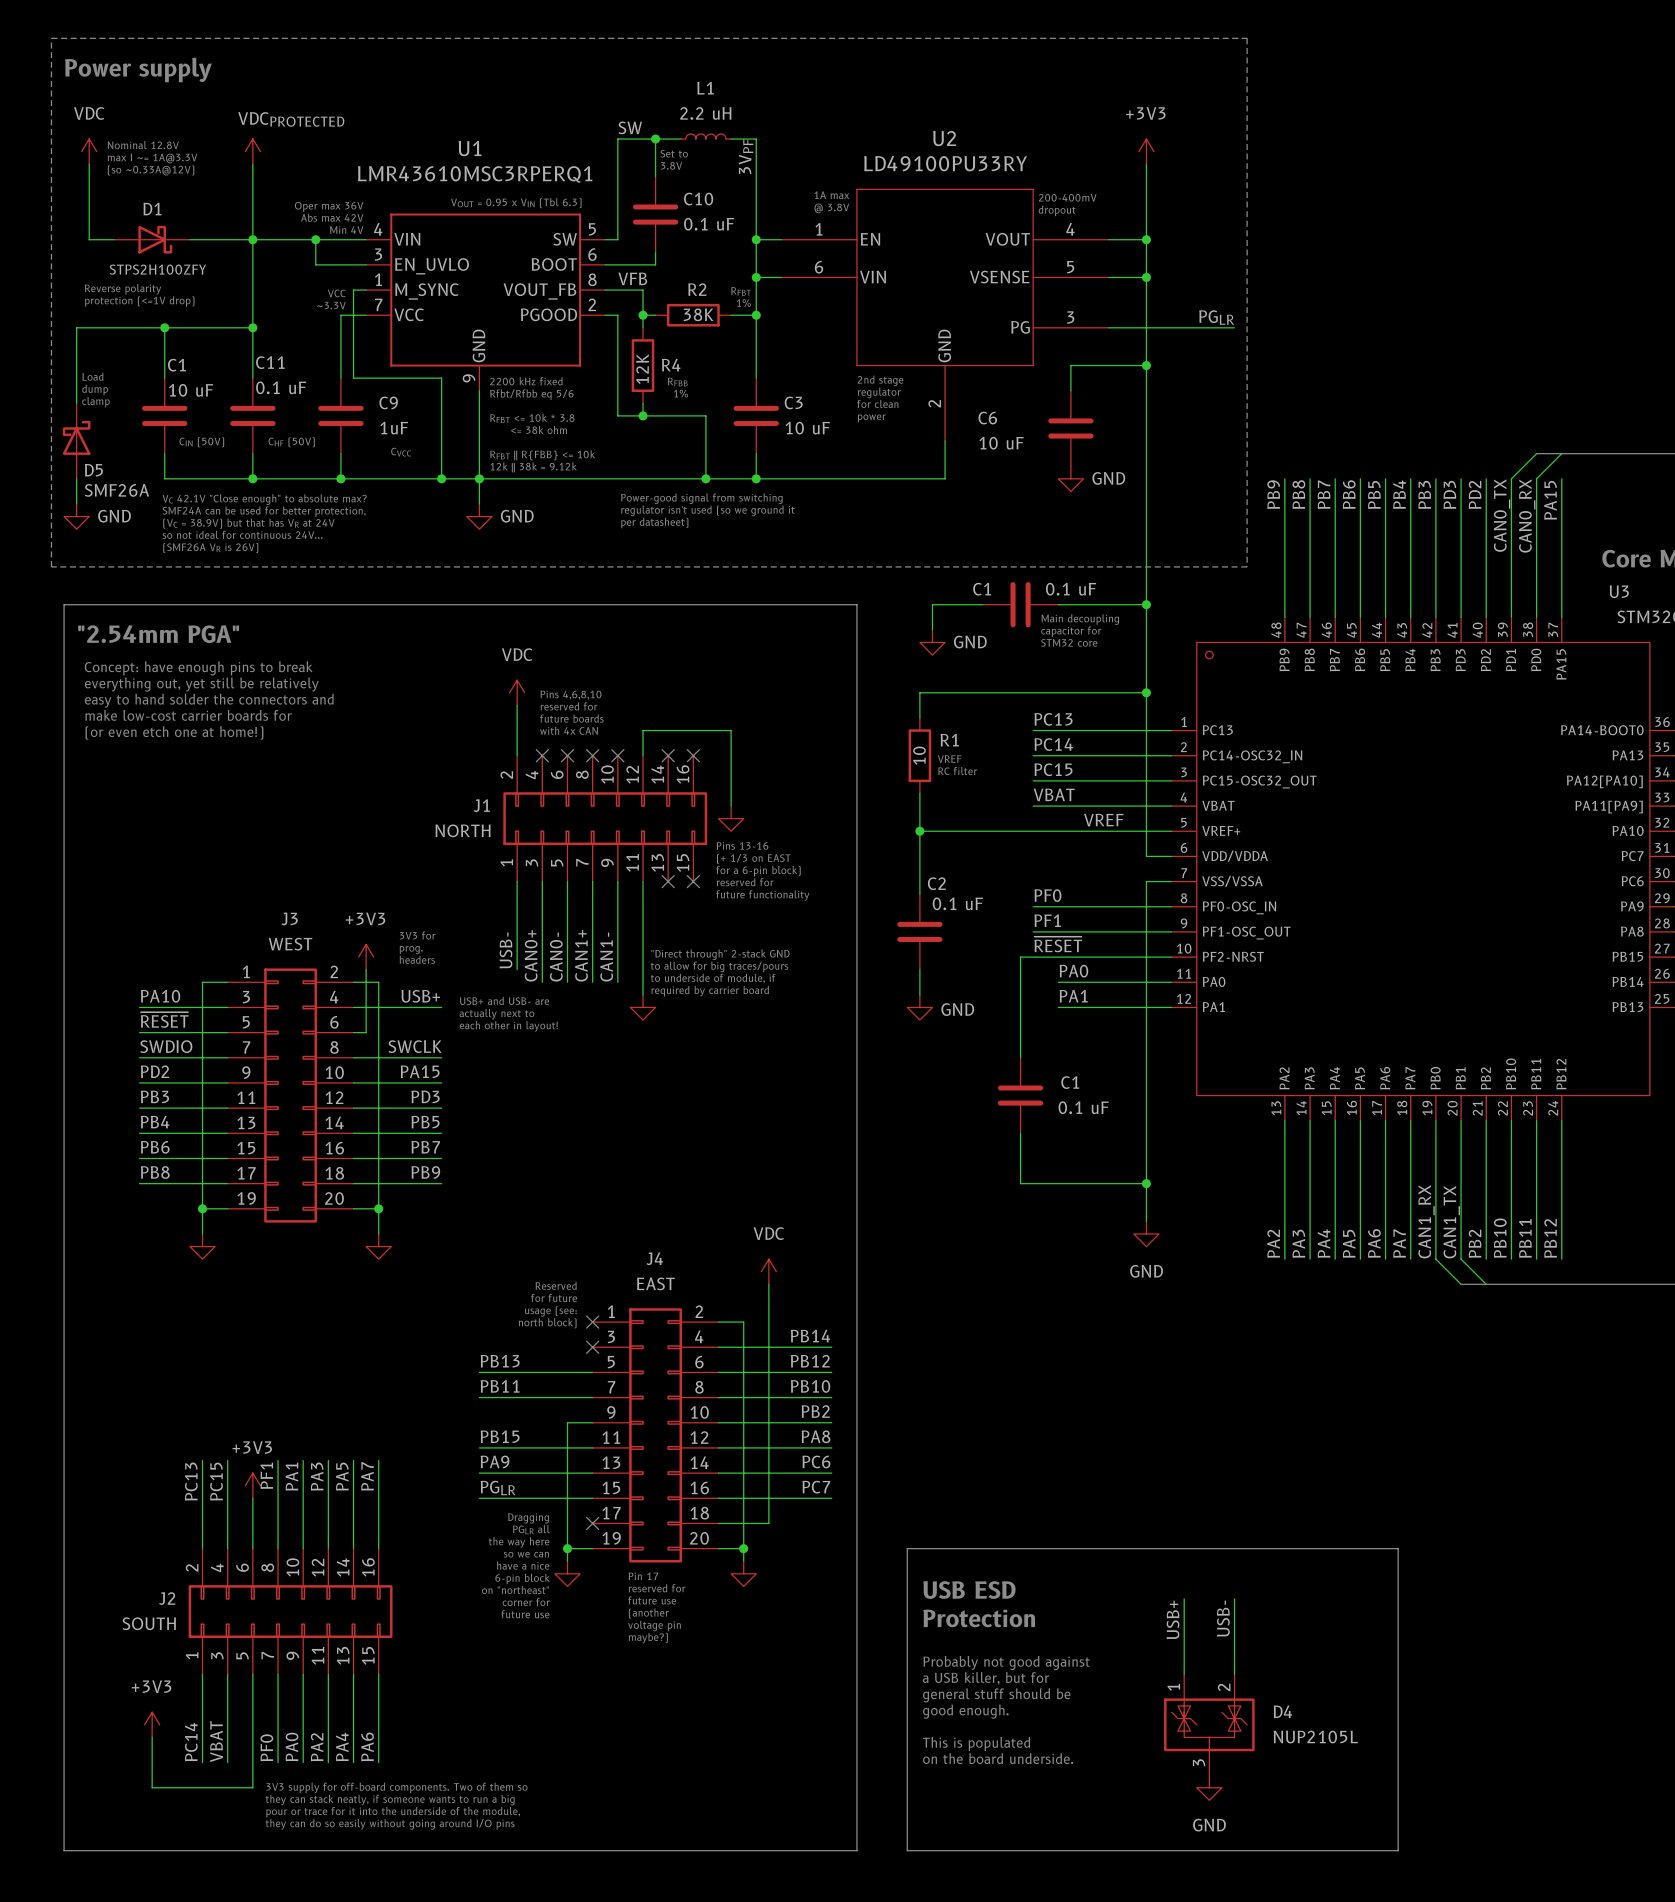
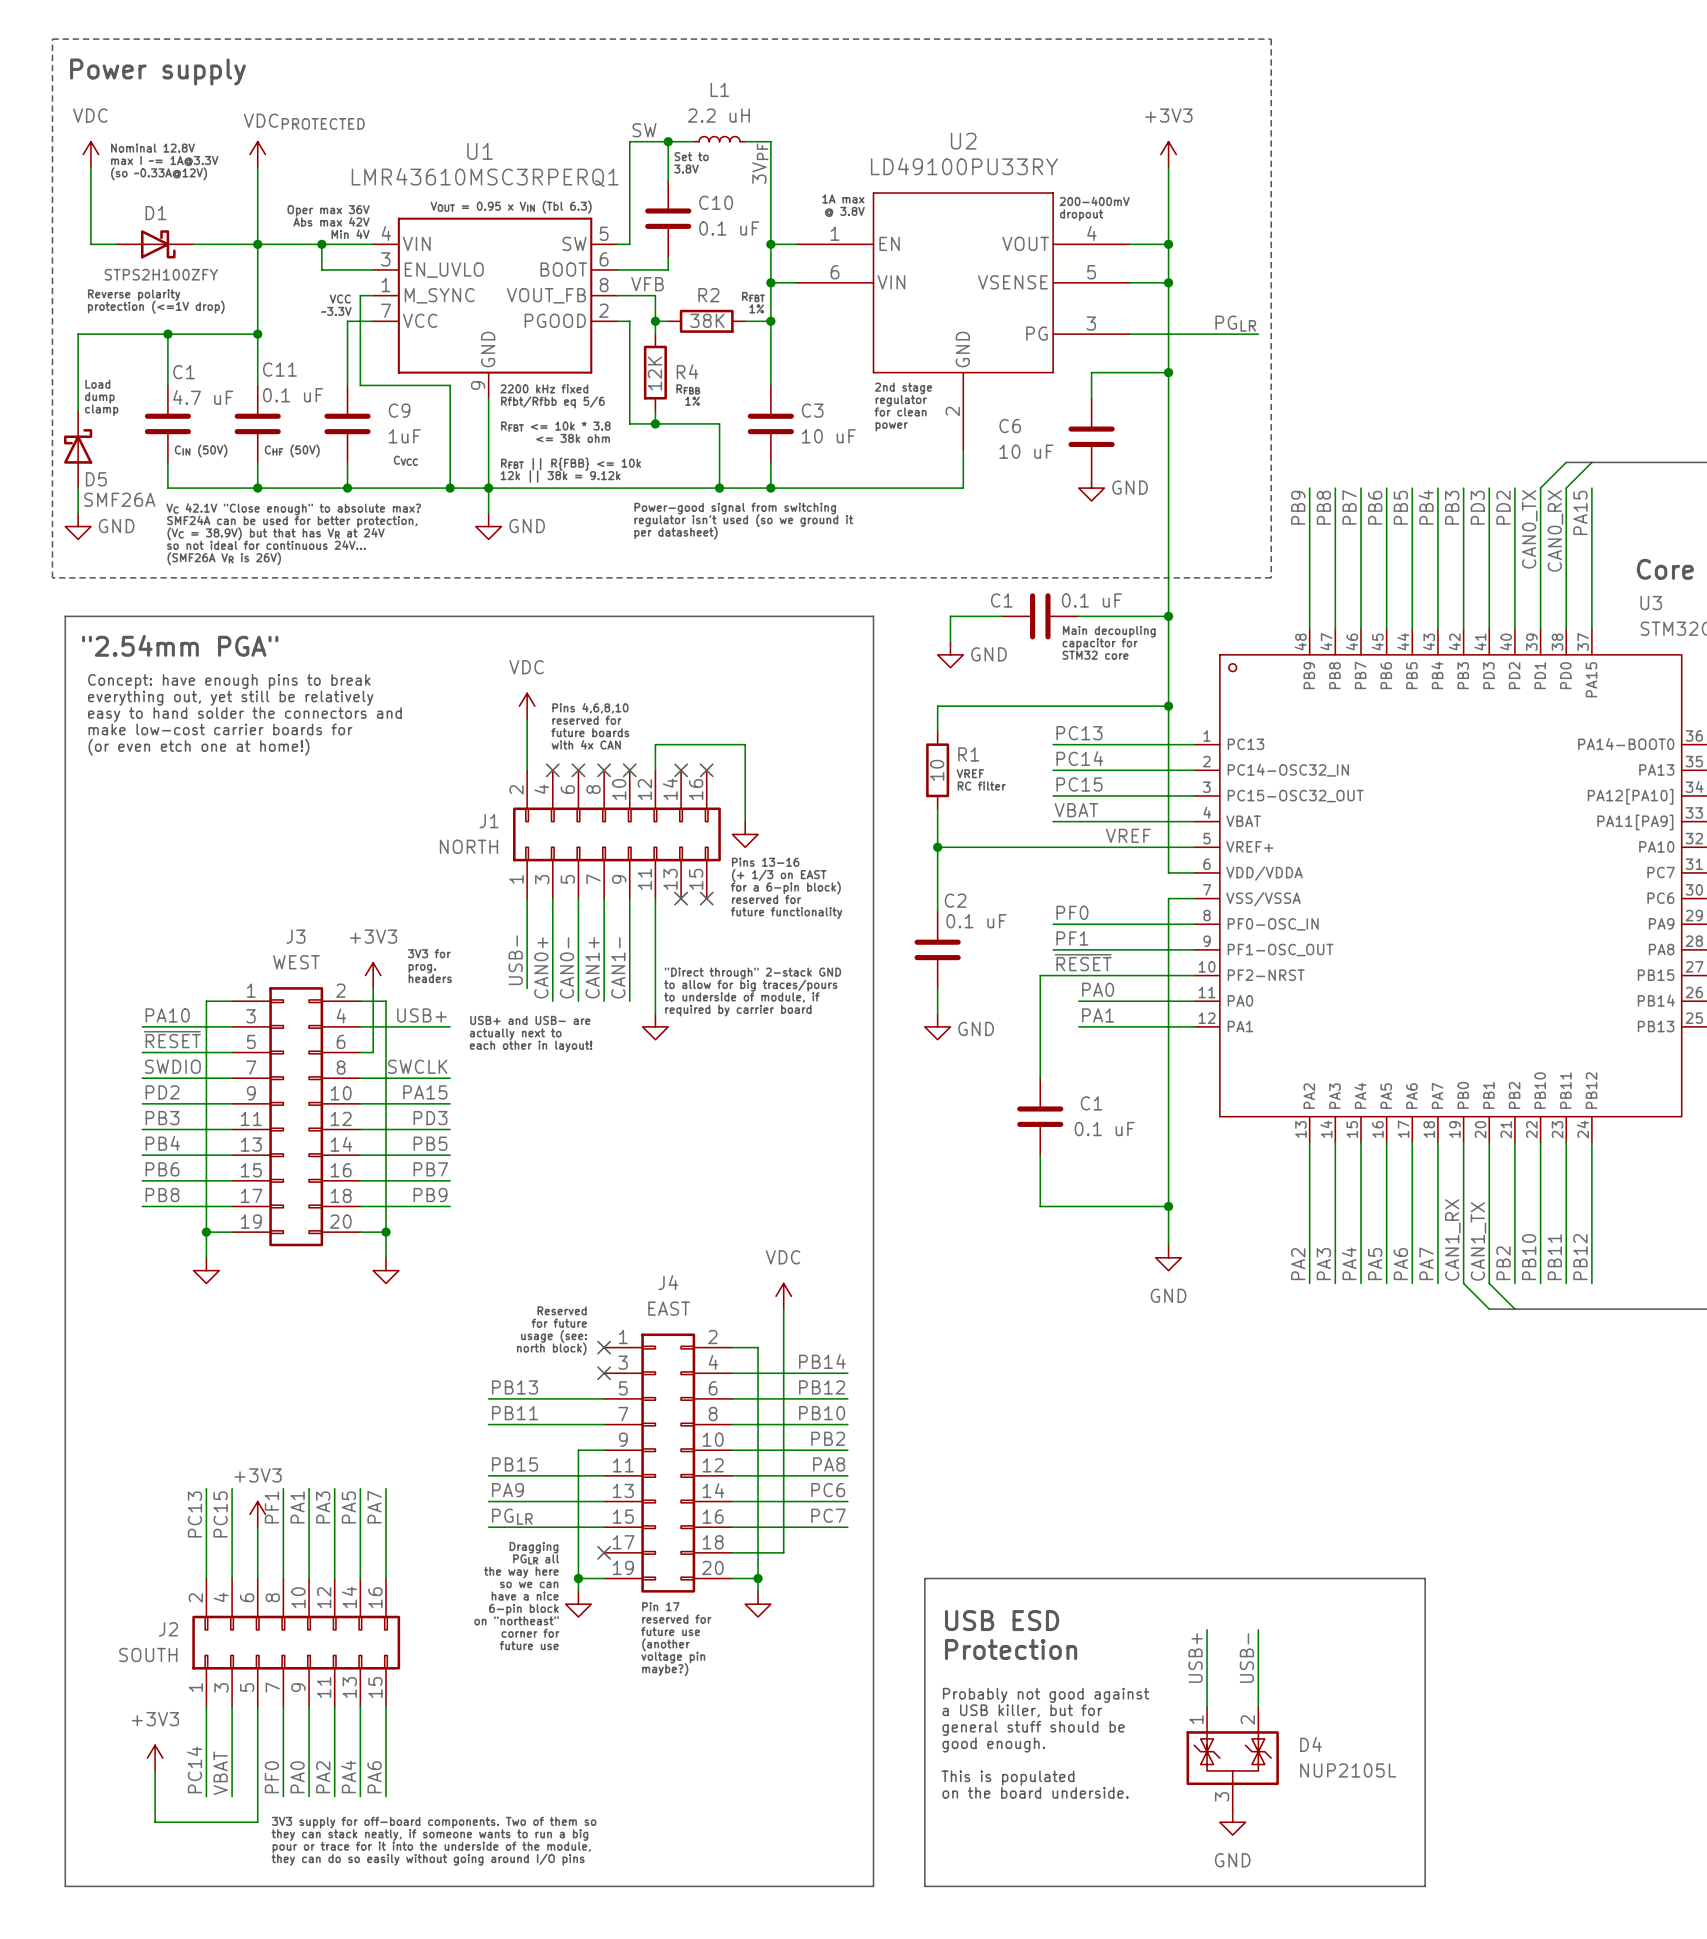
C1 value: 10 uF (191, 390) -> 4.7 uF (203, 397)

